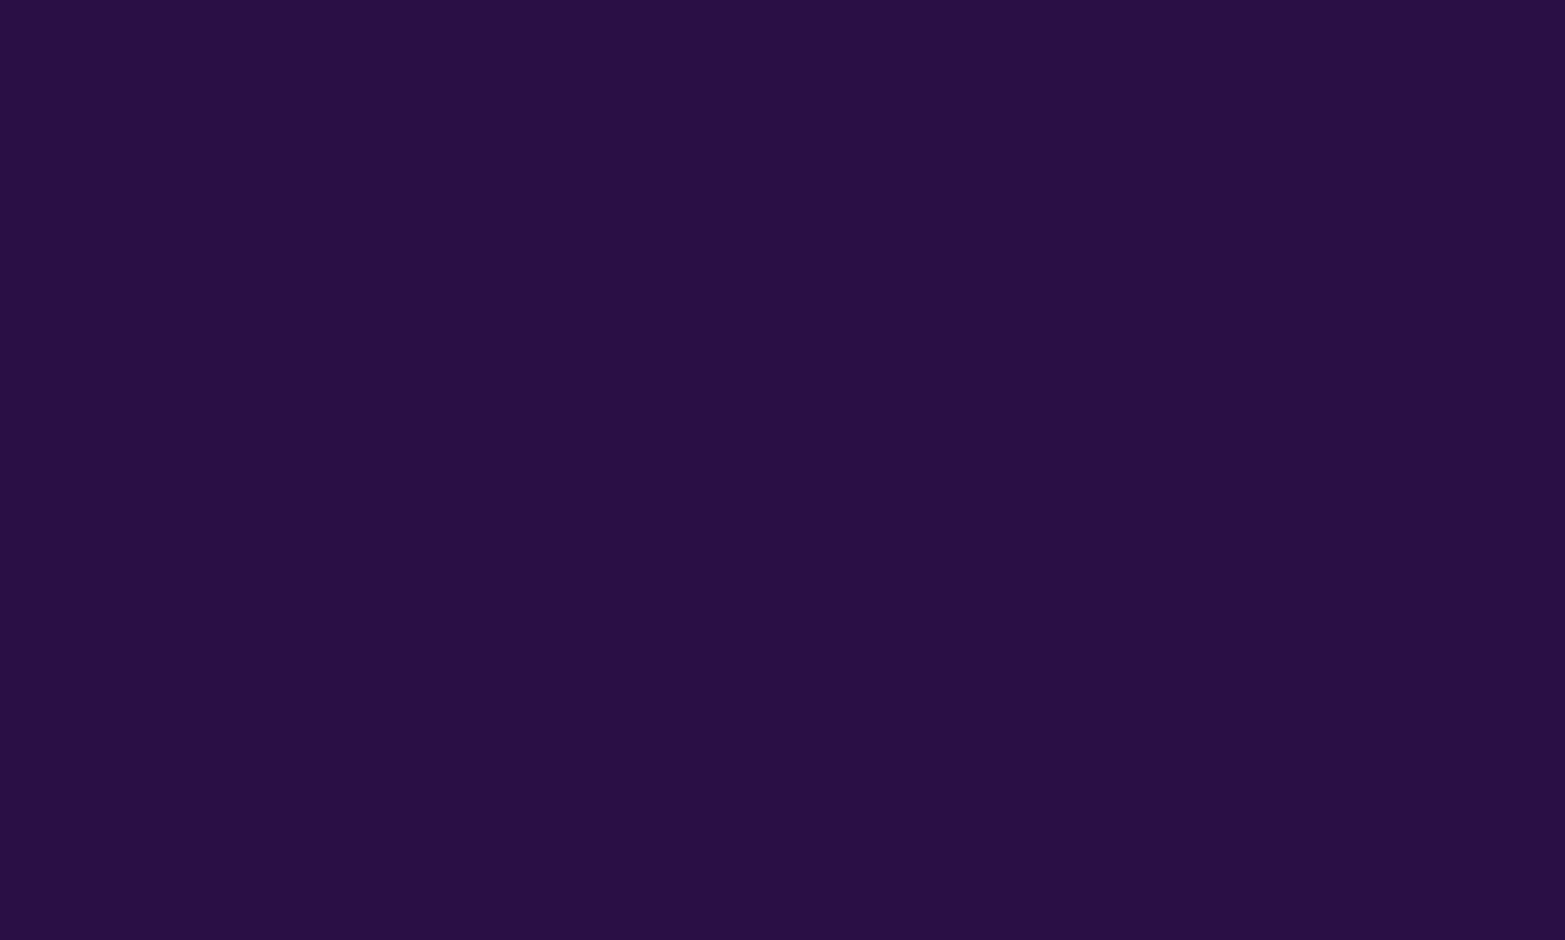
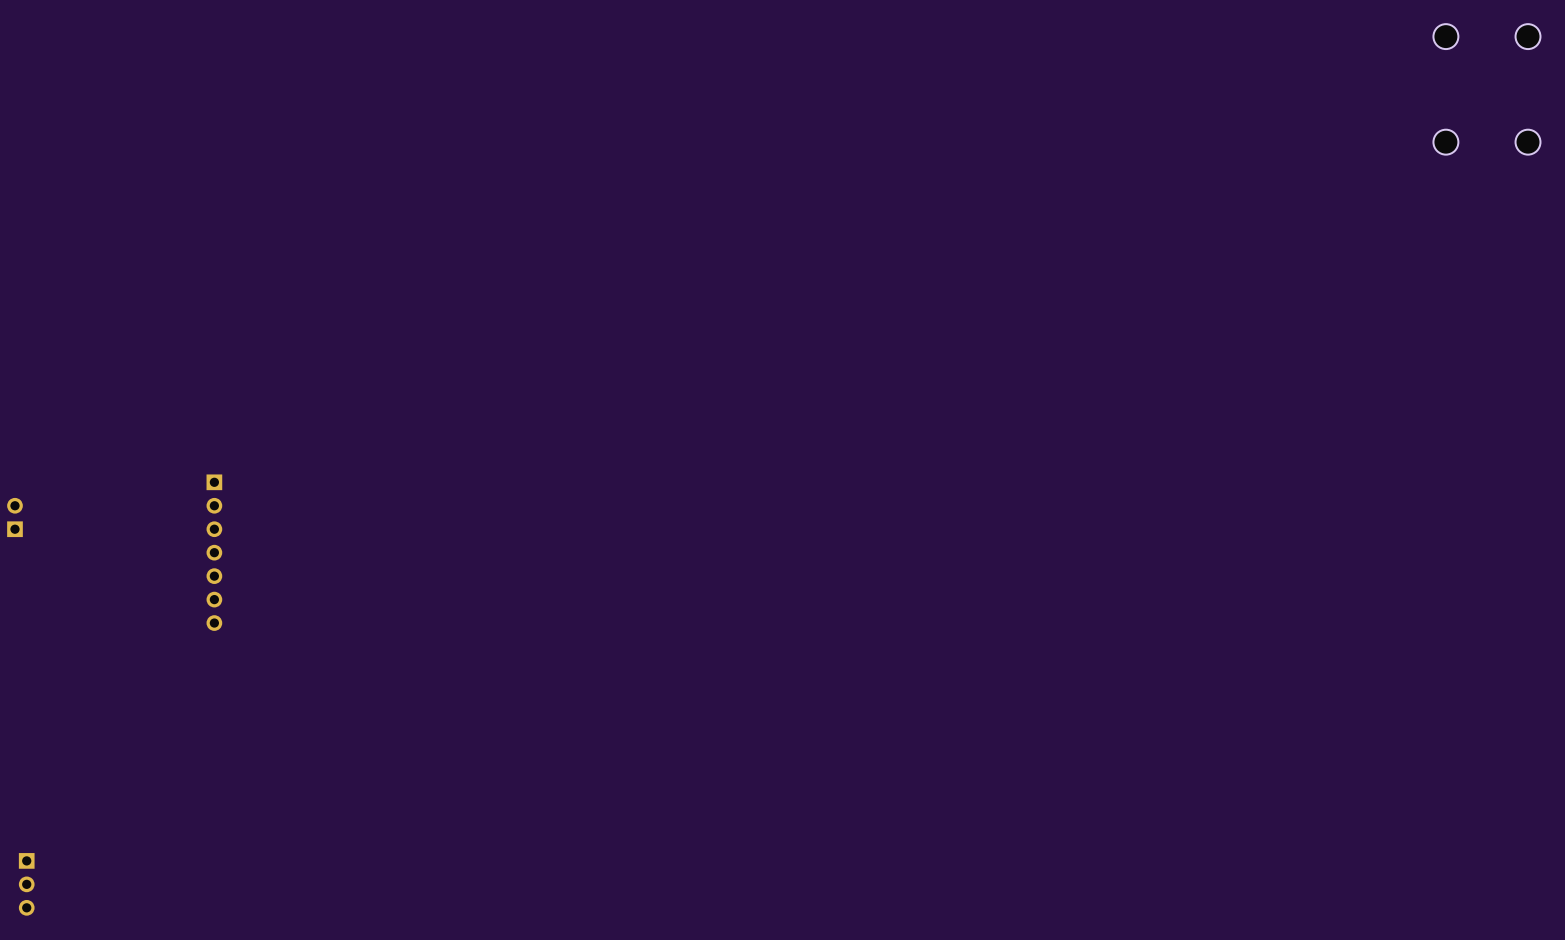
part: none -> (1445, 36)
part: none -> (1528, 36)
part: none -> (1445, 142)
part: none -> (1528, 142)
part: none -> (14, 517)
part: none -> (214, 552)
part: none -> (26, 884)

